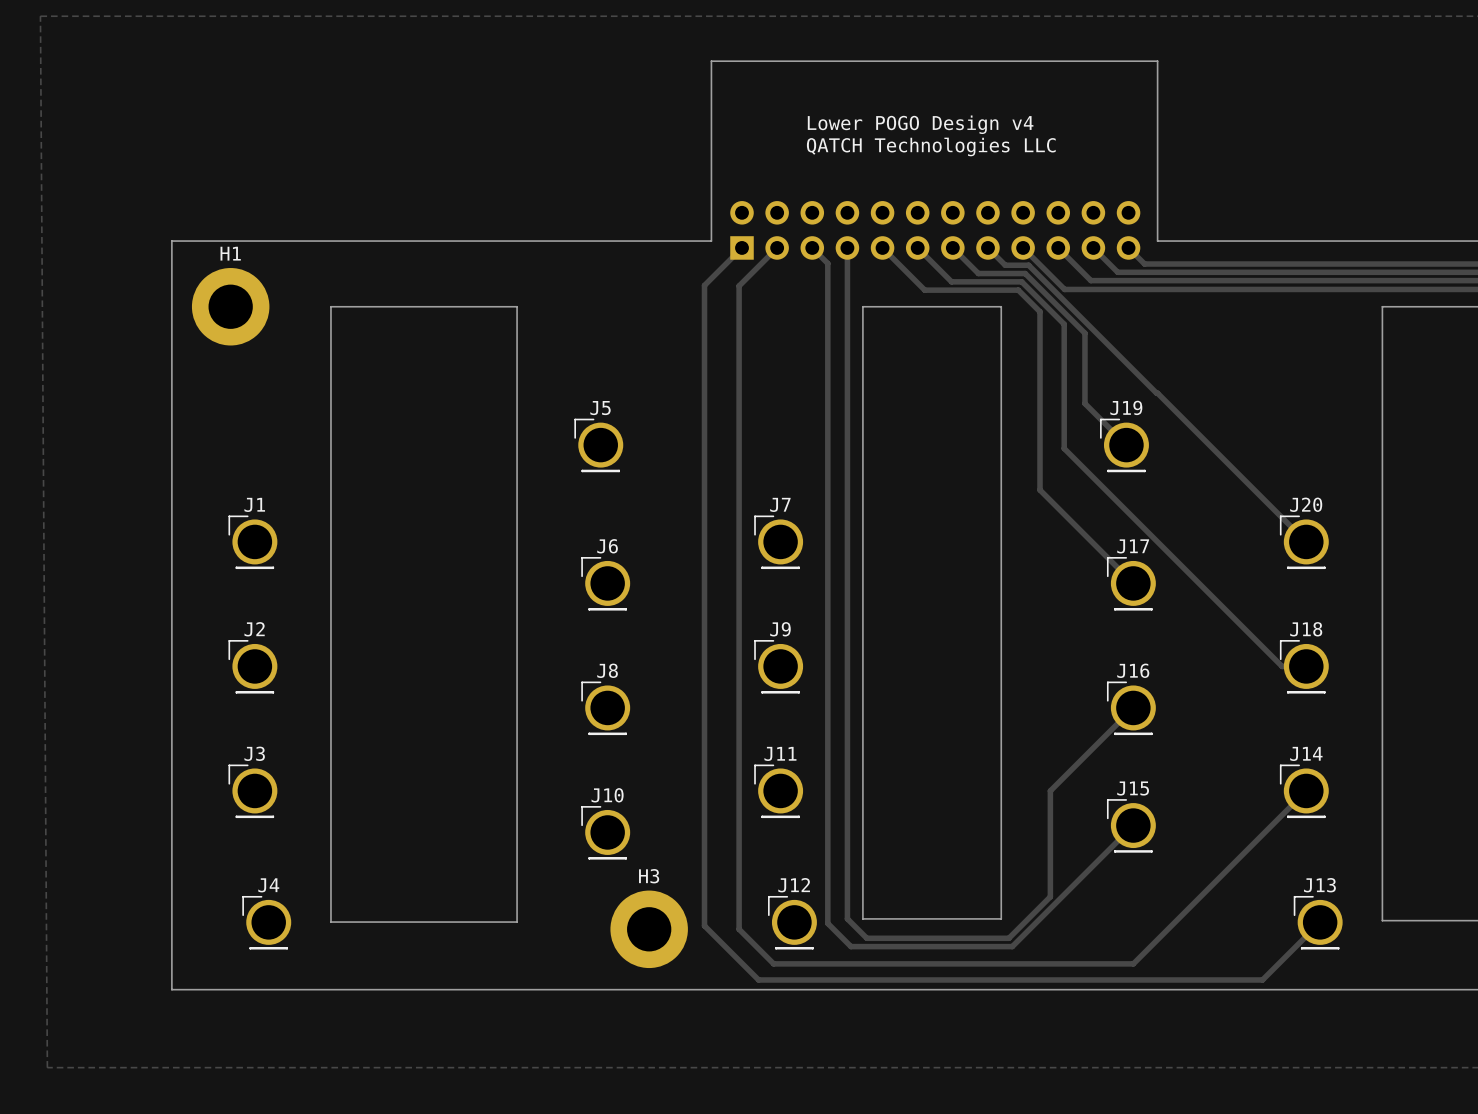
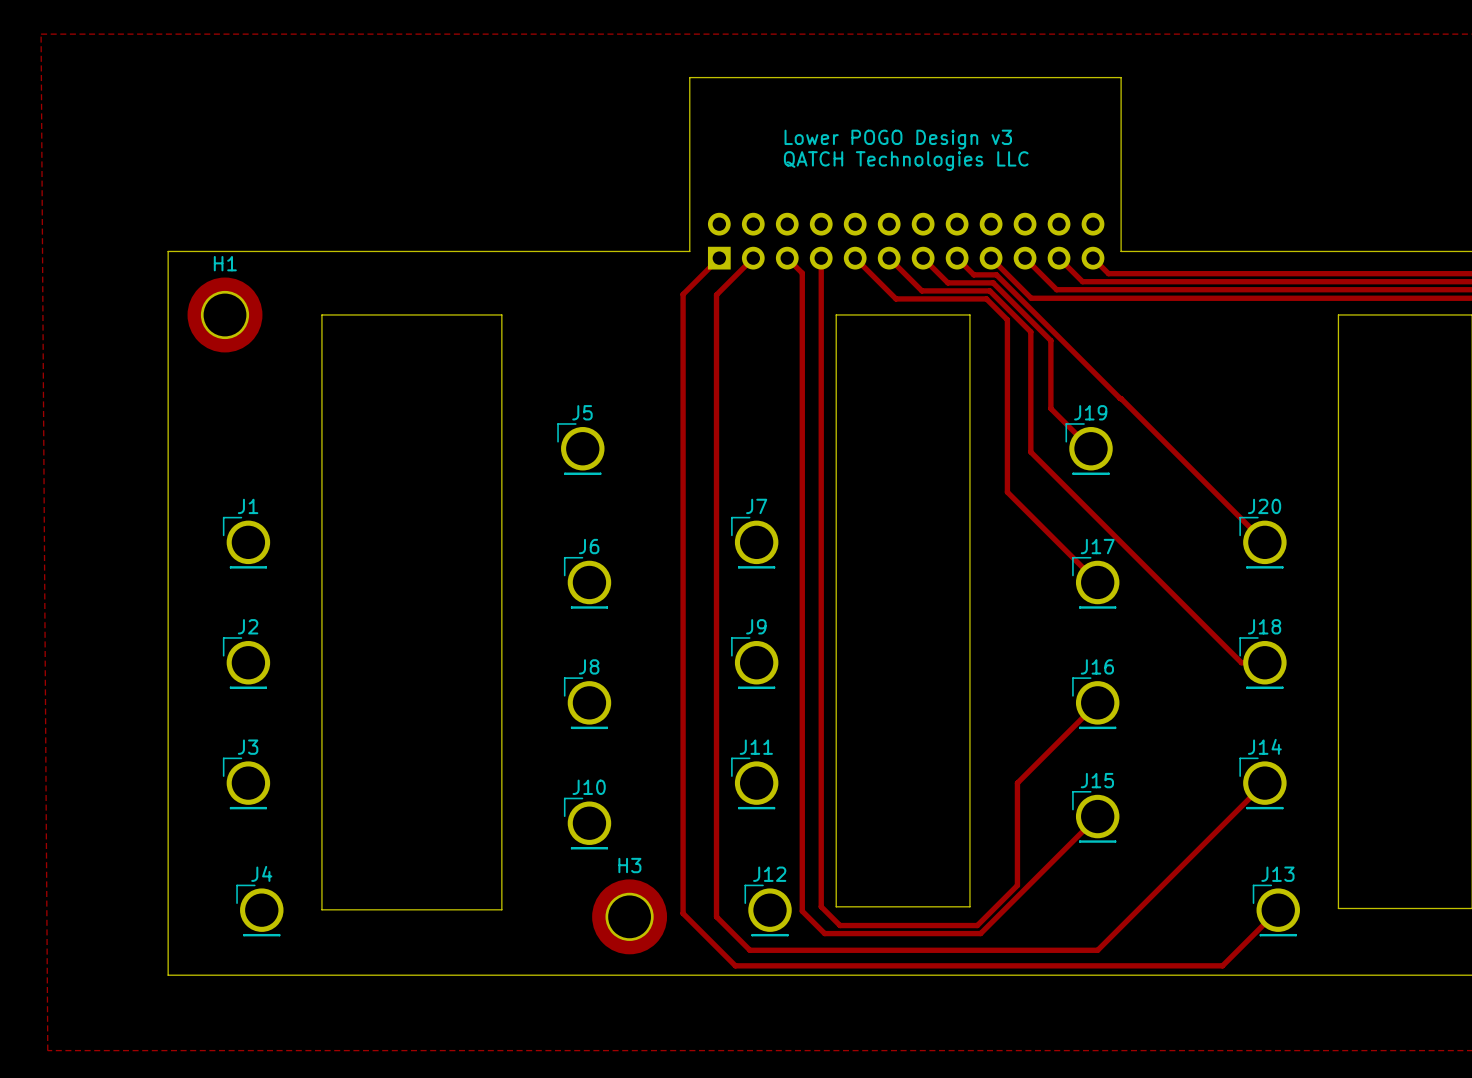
text: Lower POGO Design v4 (920, 124) -> Lower POGO Design v3 (898, 139)

